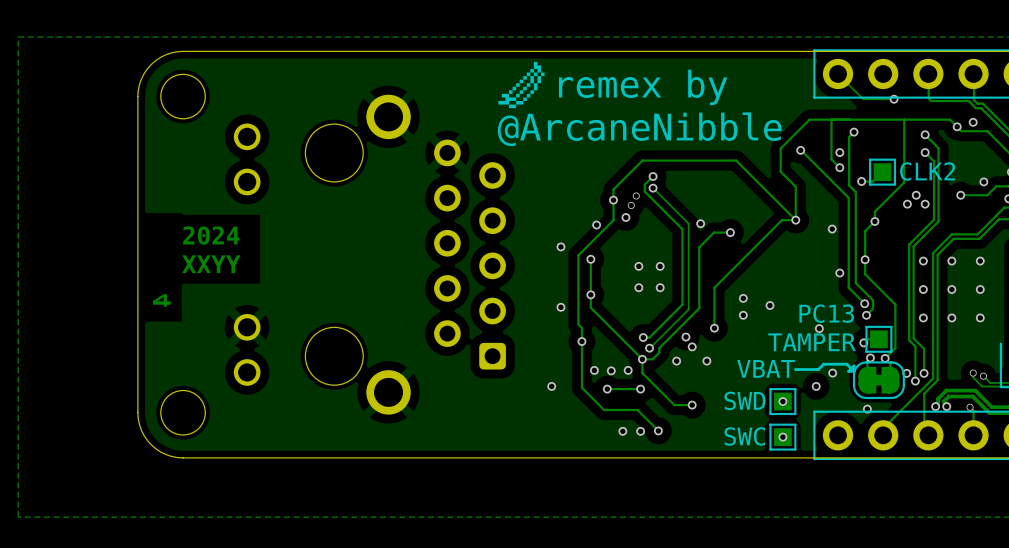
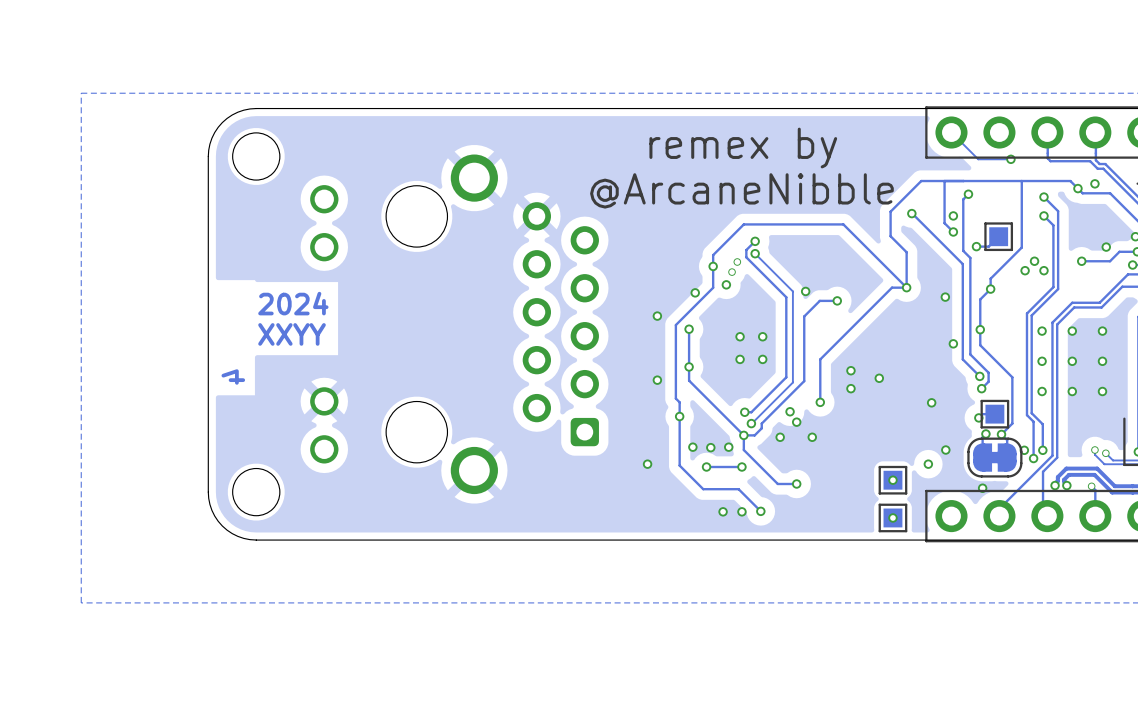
drawing: [498, 61, 545, 109] -> none
text: CLK2 (927, 171) -> none
text: PC13 (826, 313) -> none
text: TAMPER (812, 342) -> none
text: VBAT (766, 368) -> none
line: (795, 369) (818, 369) (823, 364) (846, 364) (854, 371) -> none
line: (854, 371) (854, 365) (848, 371) (854, 371) -> none
text: SWD (744, 400) -> none
text: SWC (744, 436) -> none

